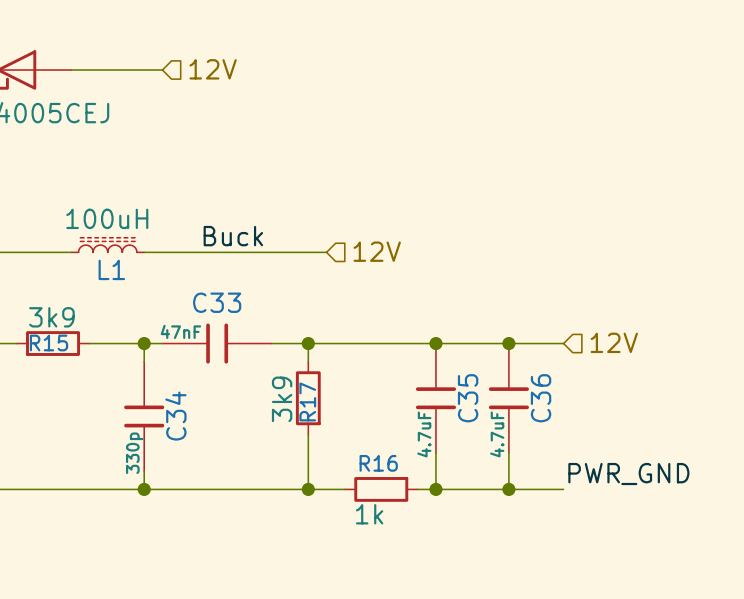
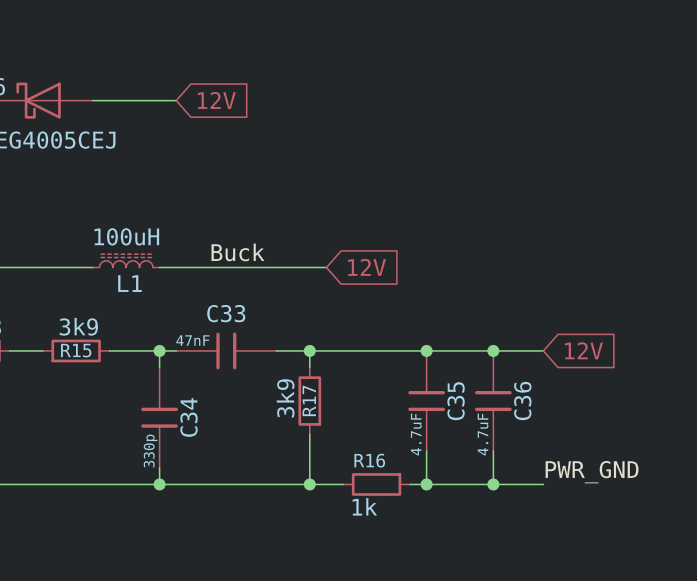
hierarchical label: 12V (213, 69) -> none
global label: none -> 12V (216, 100)
hierarchical label: 12V (377, 251) -> none
global label: none -> 12V (366, 267)
hierarchical label: 12V (614, 342) -> none
global label: none -> 12V (583, 350)

